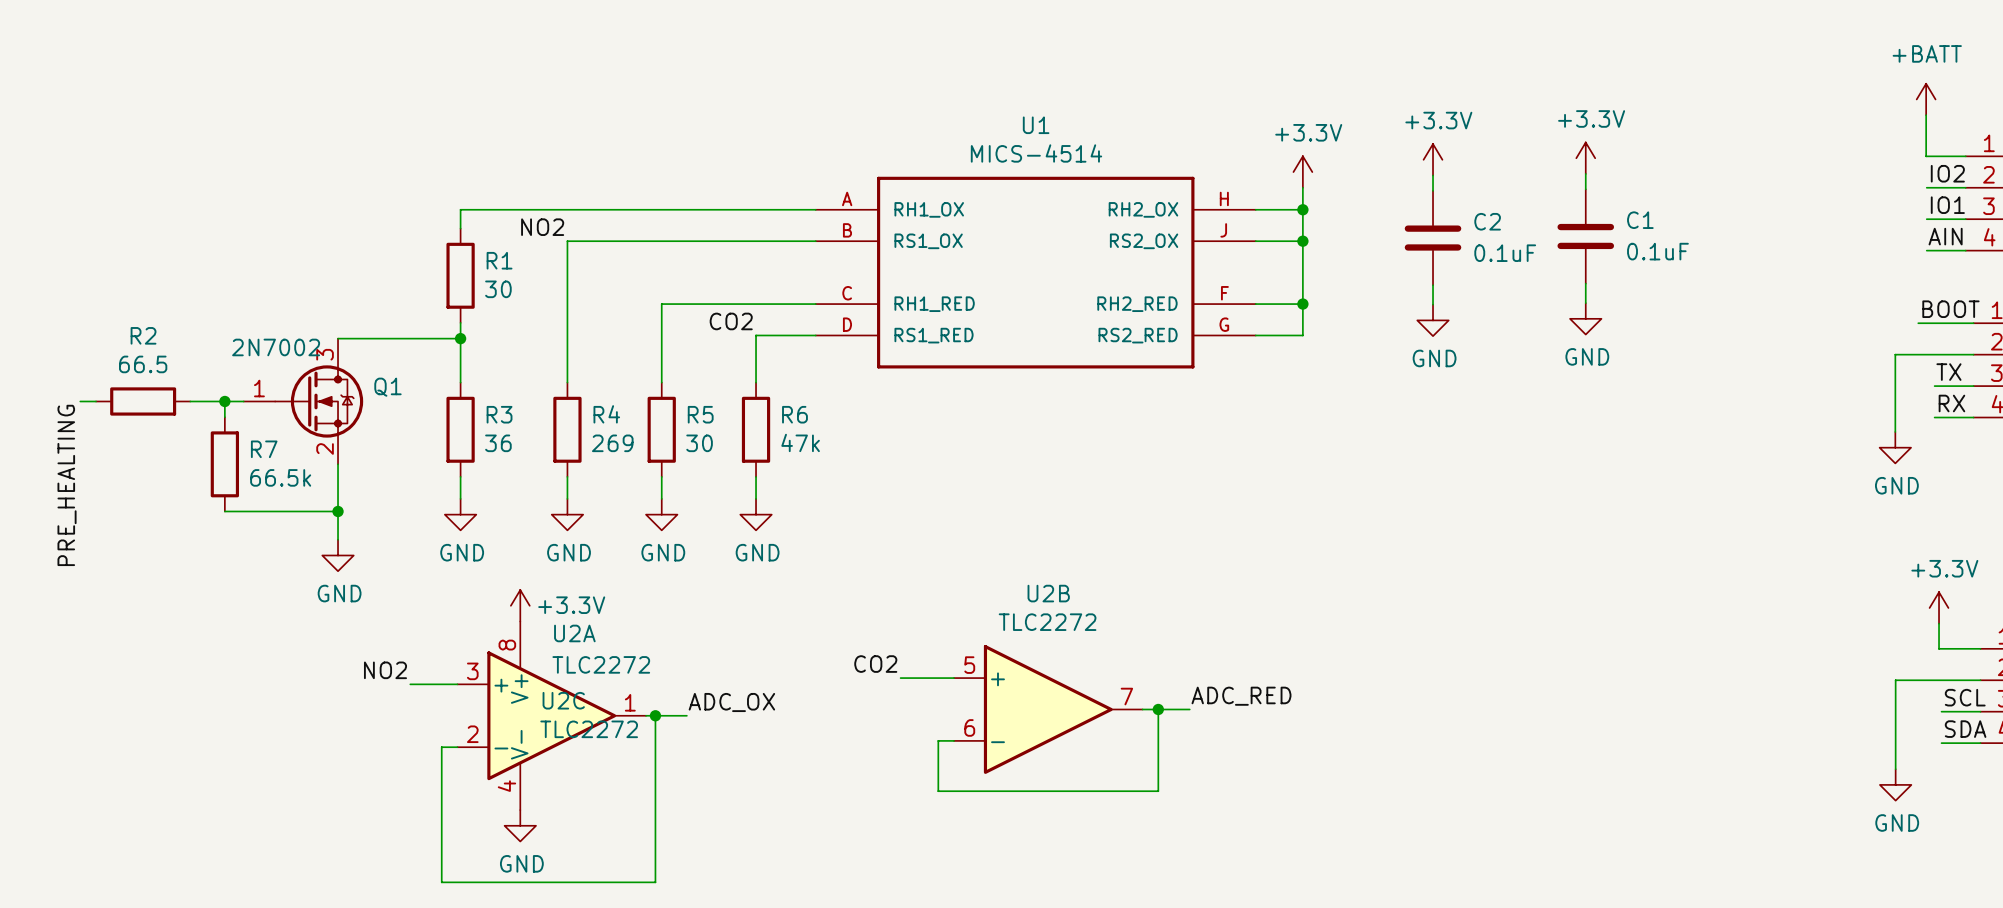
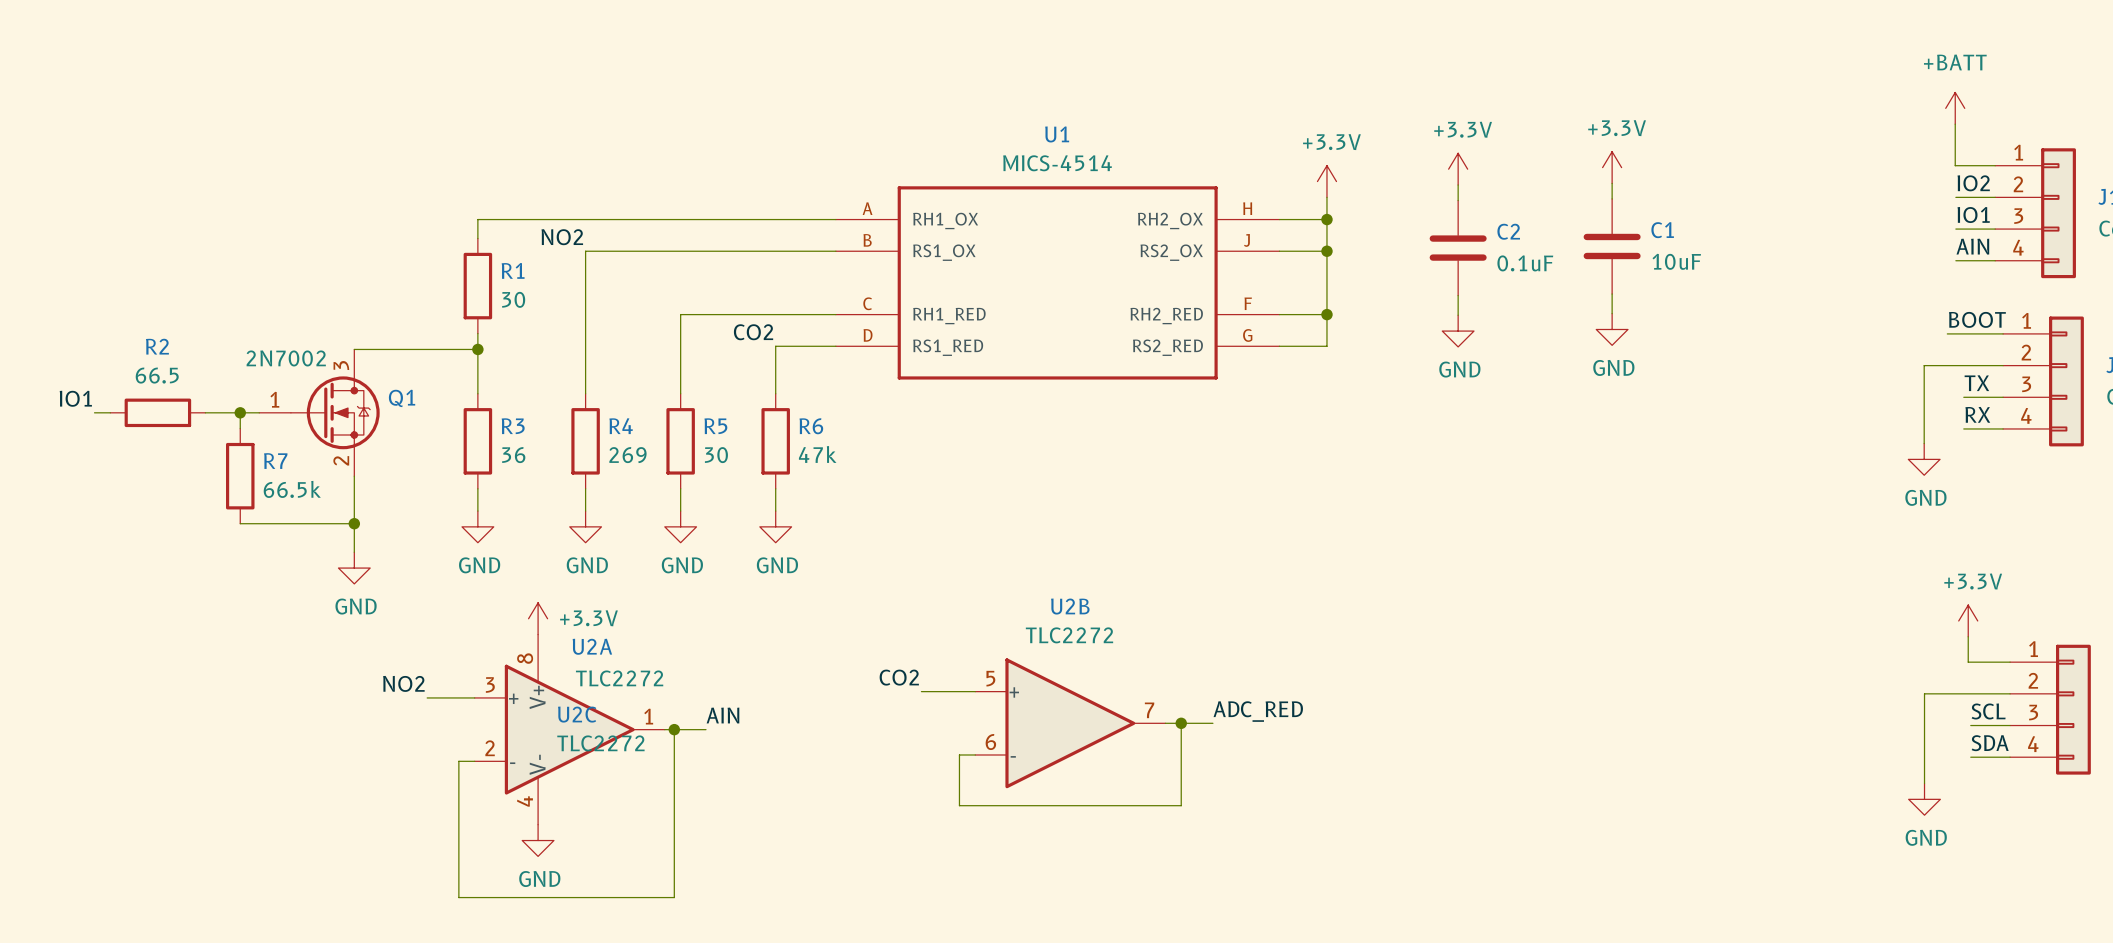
C1 value: 0.1uF (1657, 251) -> 10uF (1676, 261)
label: PRE_HEALTING (67, 485) -> IO1 (75, 398)
label: ADC_OX (731, 702) -> AIN (722, 715)

